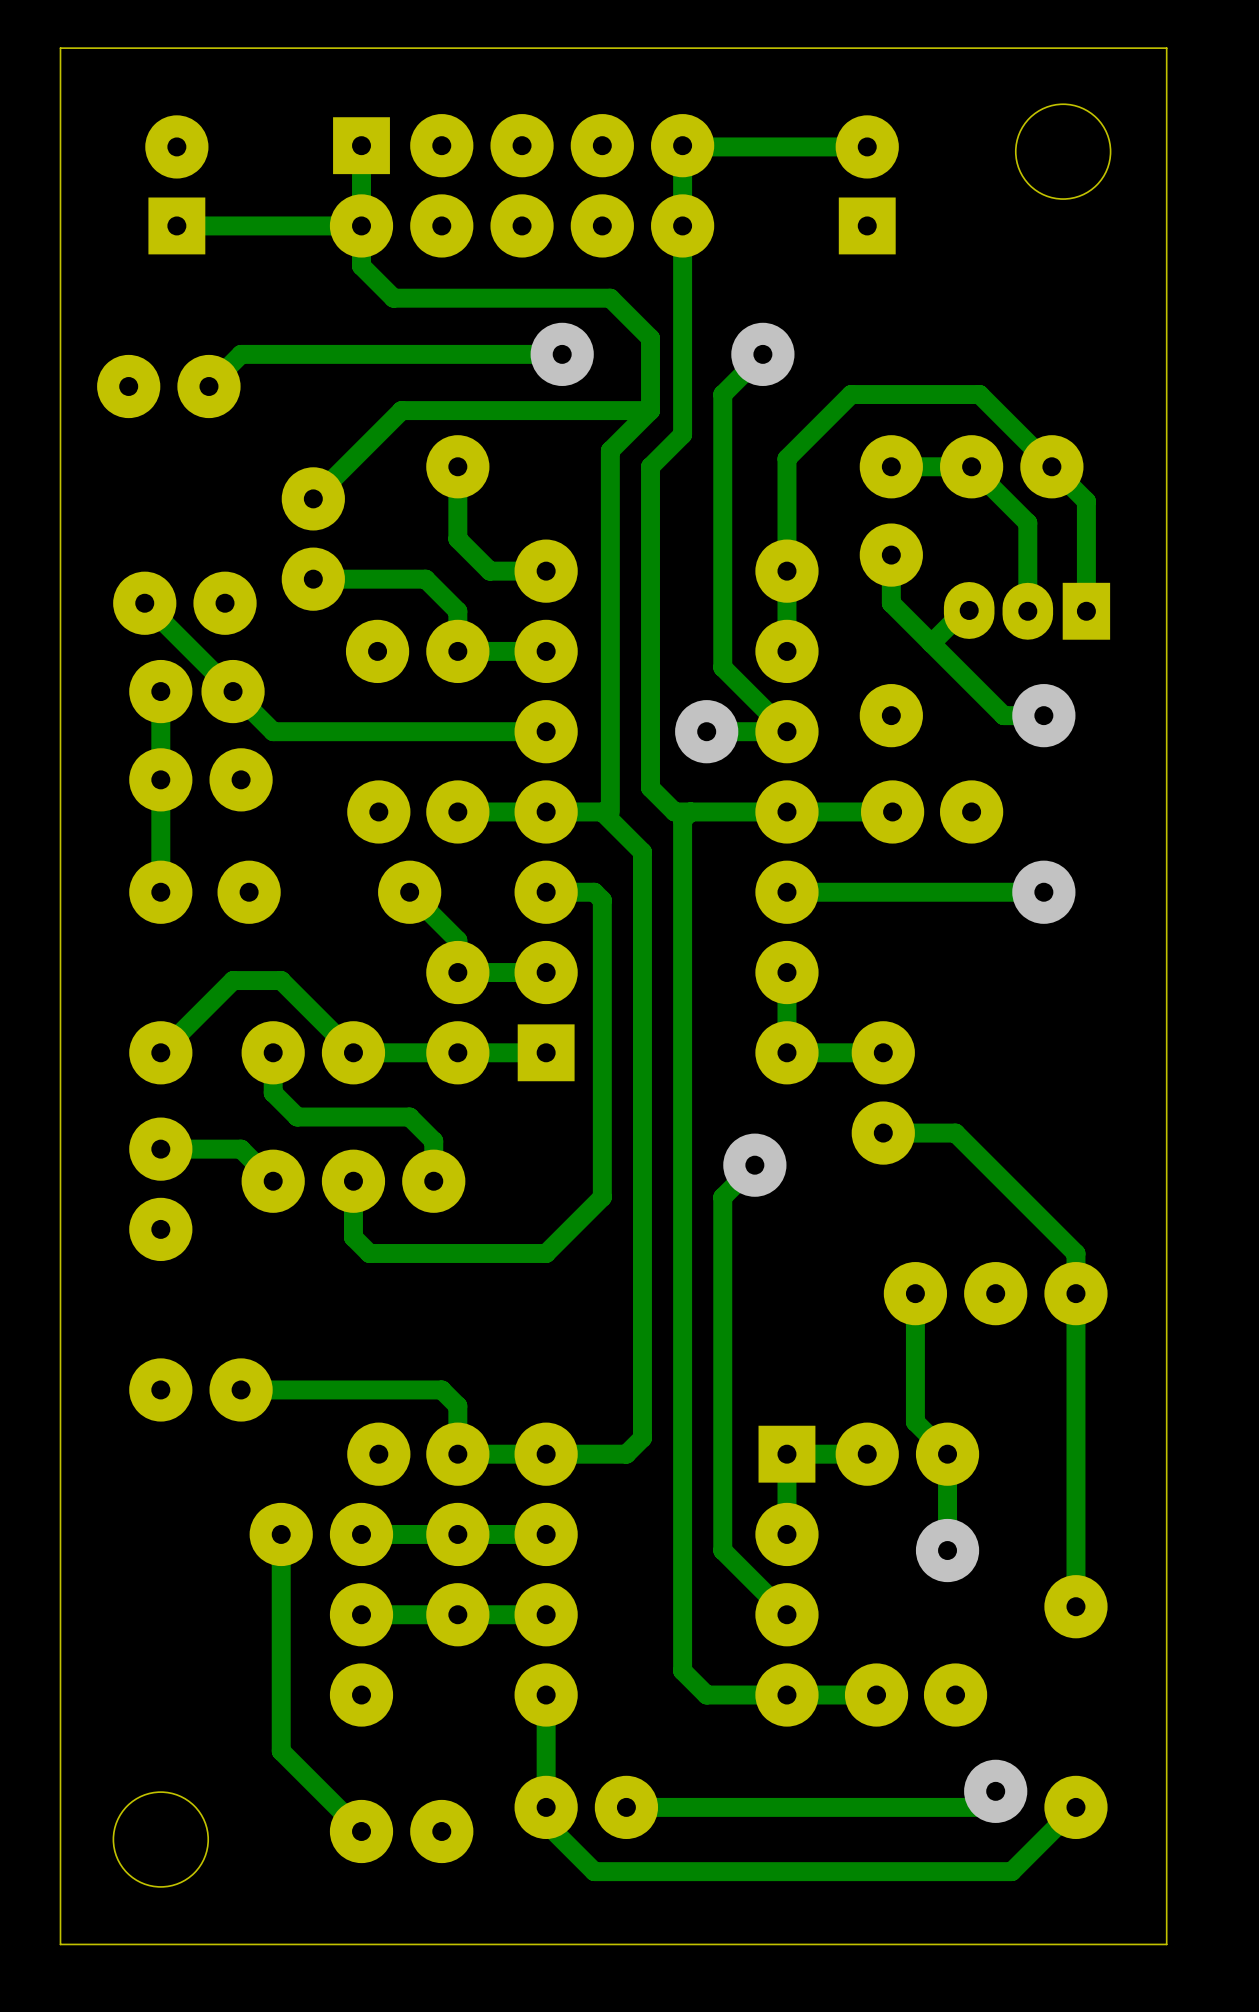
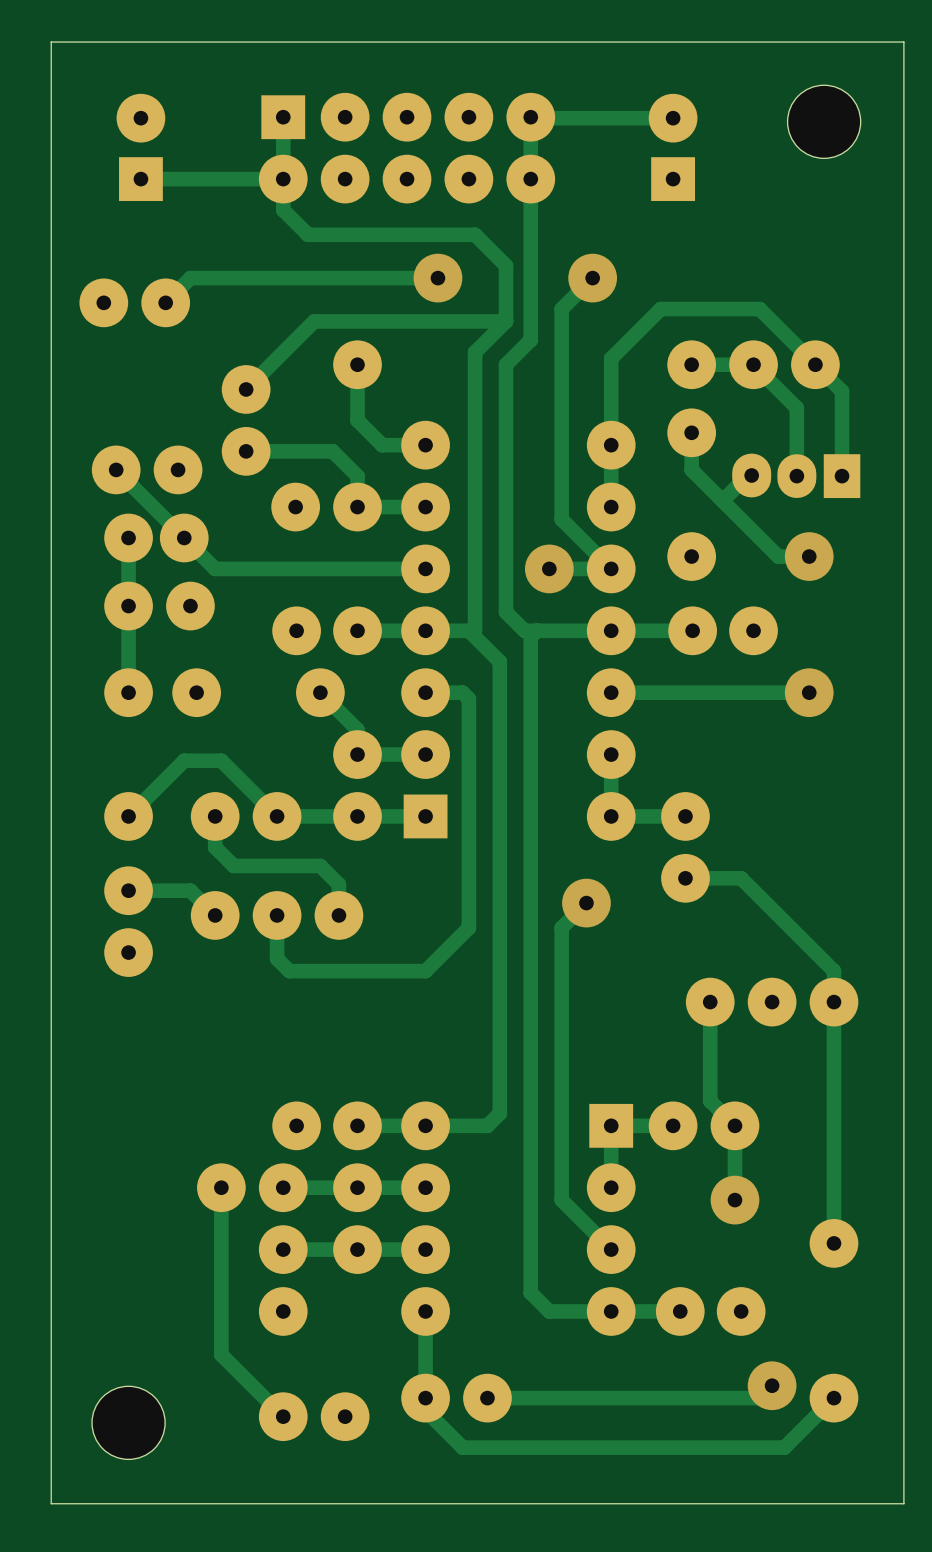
part: (200, 1389) -> none
track: (241, 1389) (441, 1389) (457, 1406) (457, 1454) -> none

